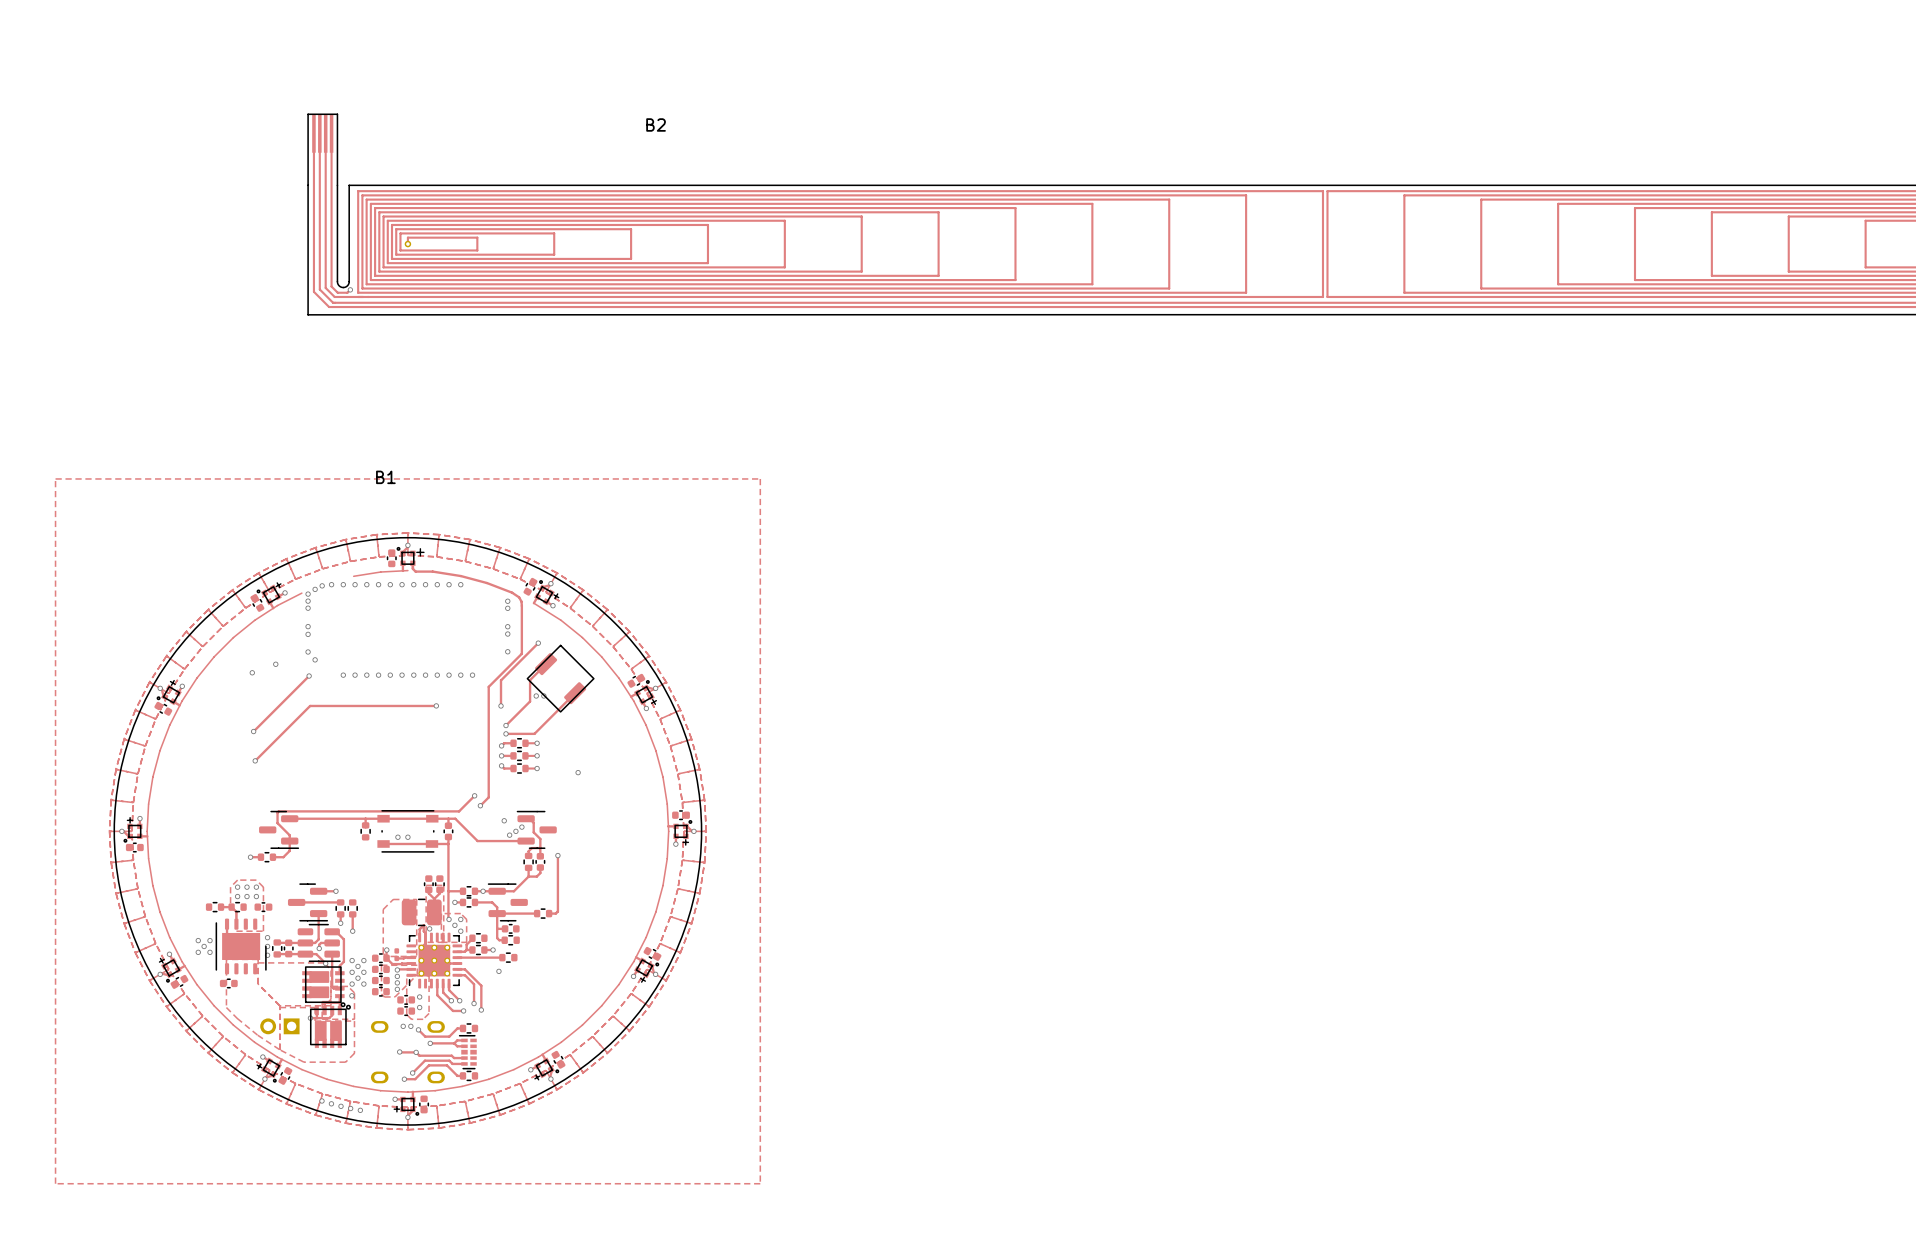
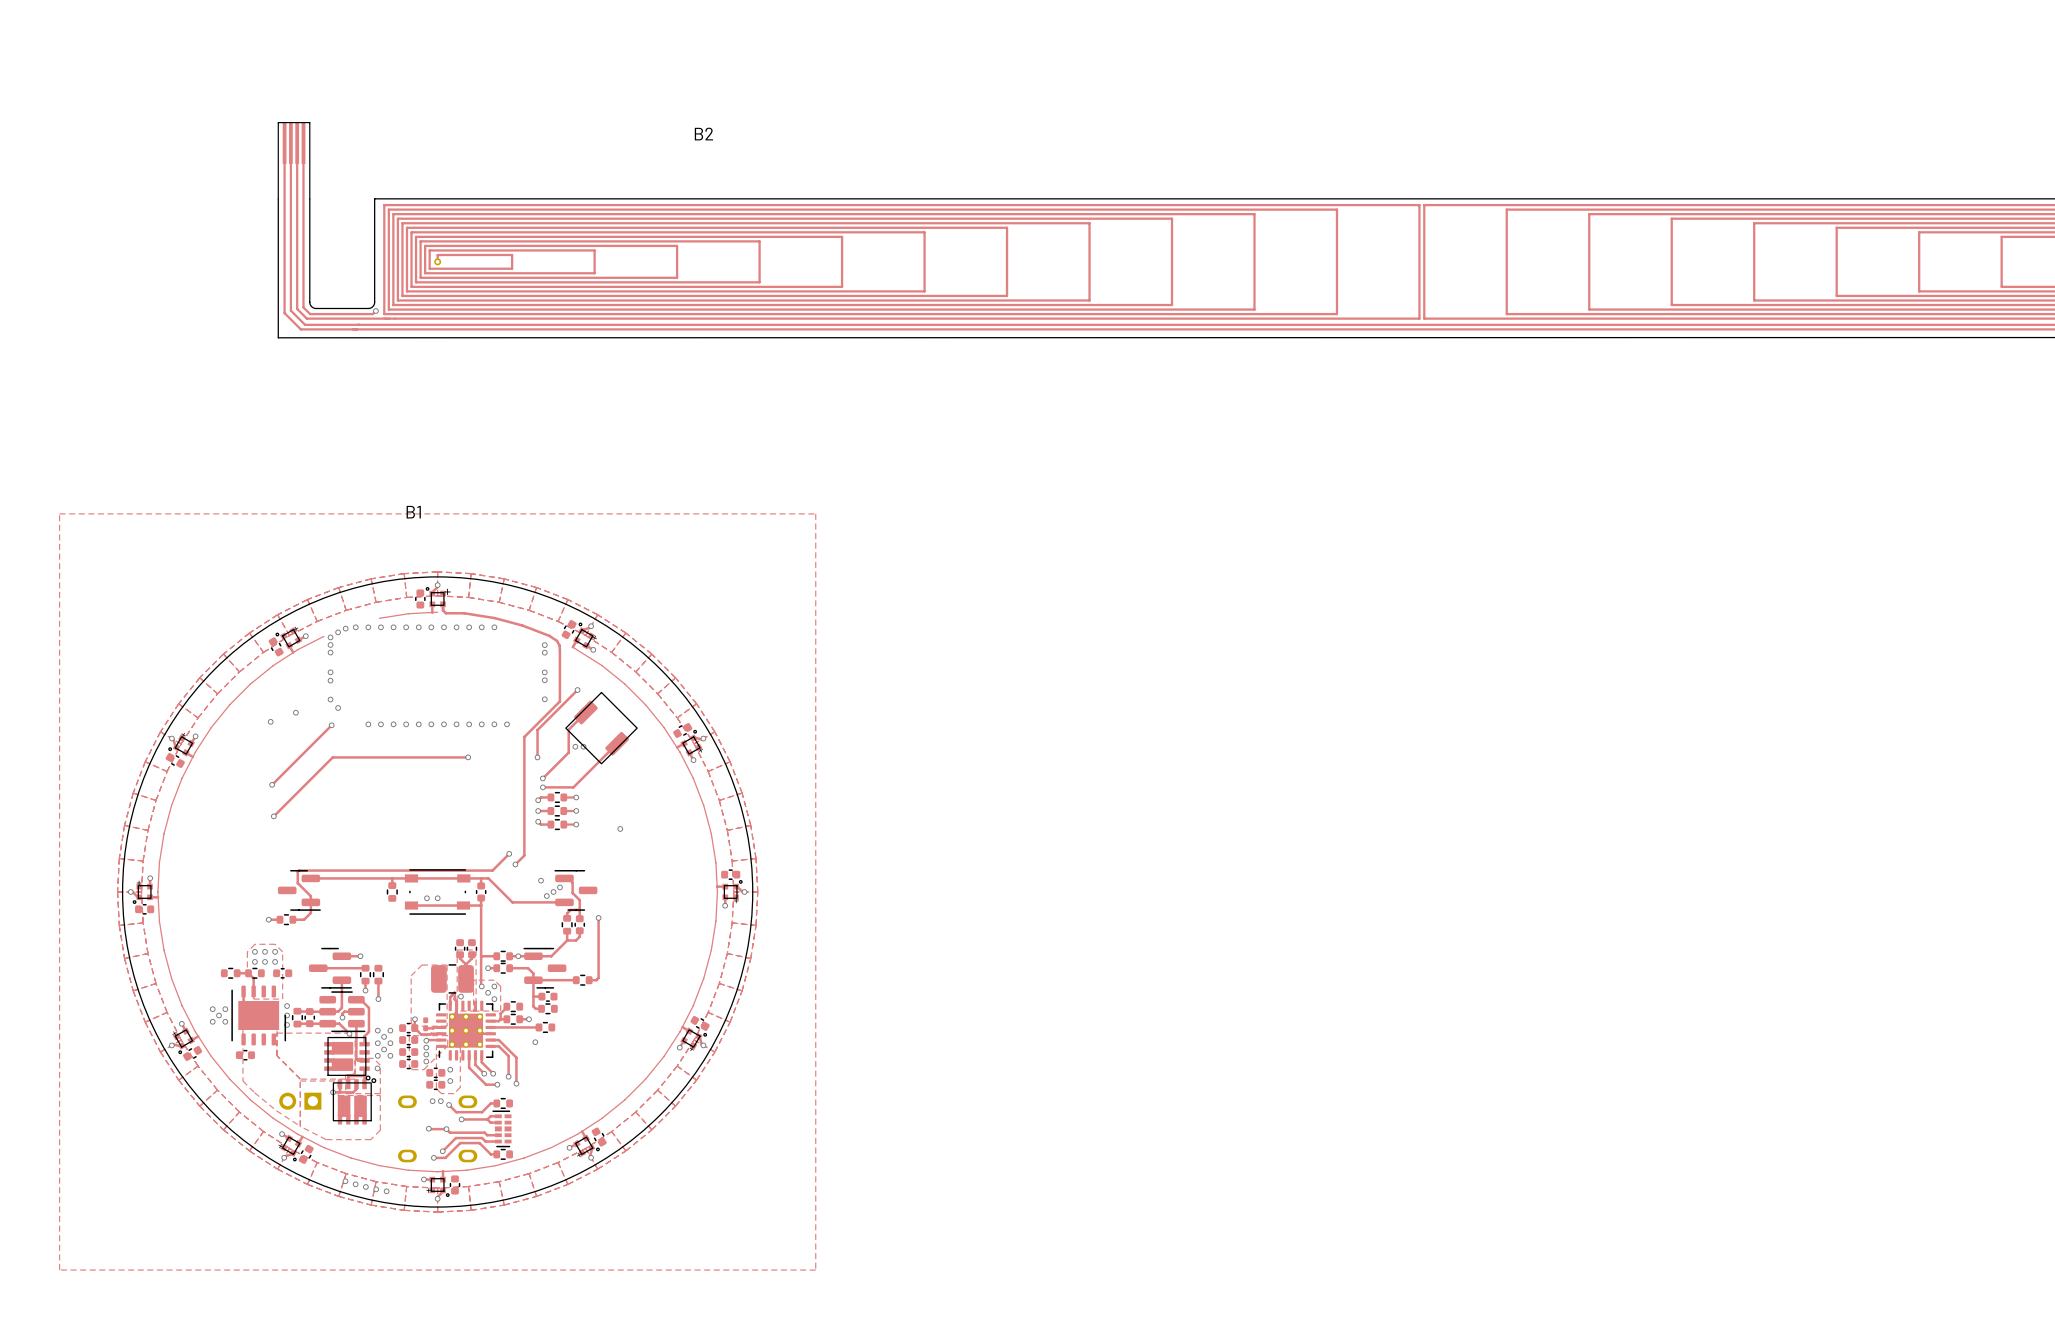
track: (313, 133) (313, 291) (329, 307) -> (284, 143) (284, 313) (300, 329) (353, 329)
track: (319, 133) (319, 289) (333, 302) -> (290, 143) (290, 310) (305, 324) (357, 324)
track: (325, 133) (325, 287) (334, 296) -> (297, 143) (297, 308) (306, 318) (359, 318)
track: (331, 133) (331, 286) (337, 292) -> (303, 143) (303, 307) (310, 314) (362, 314)
part position: (322, 149) -> (294, 160)
board edge: (308, 185) (308, 314) -> (278, 198) (278, 337) (330, 337)
board edge: (337, 185) (337, 282) (343, 287) -> (309, 198) (310, 304) (315, 308) (368, 308)

